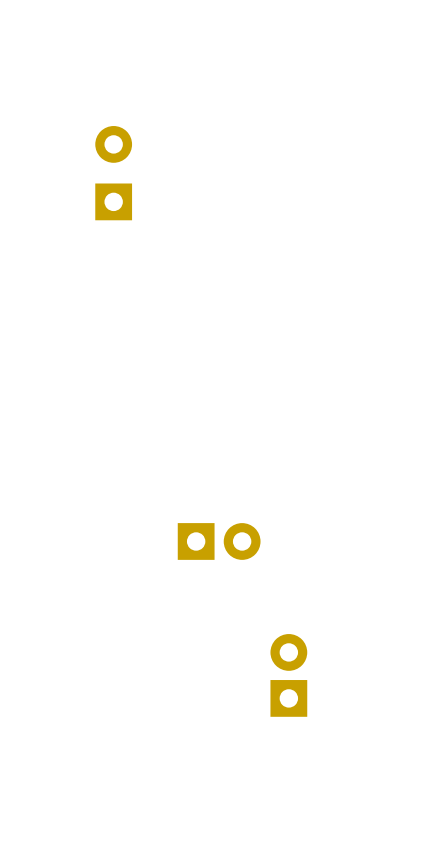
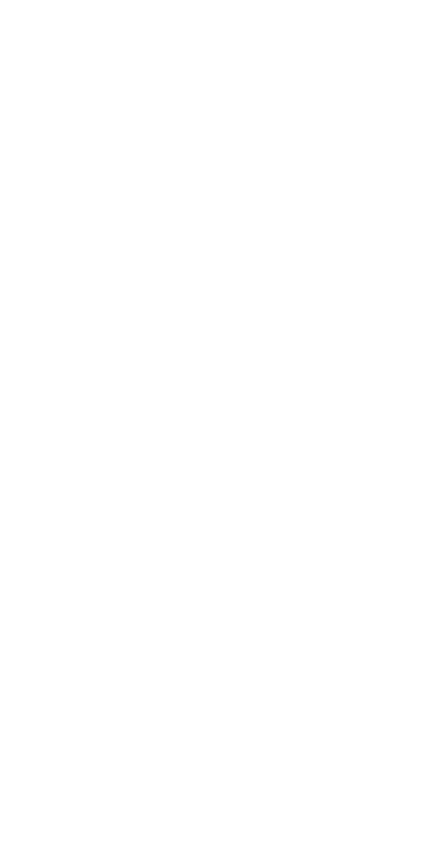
part: (113, 173) -> none
part: (219, 541) -> none
part: (288, 675) -> none

